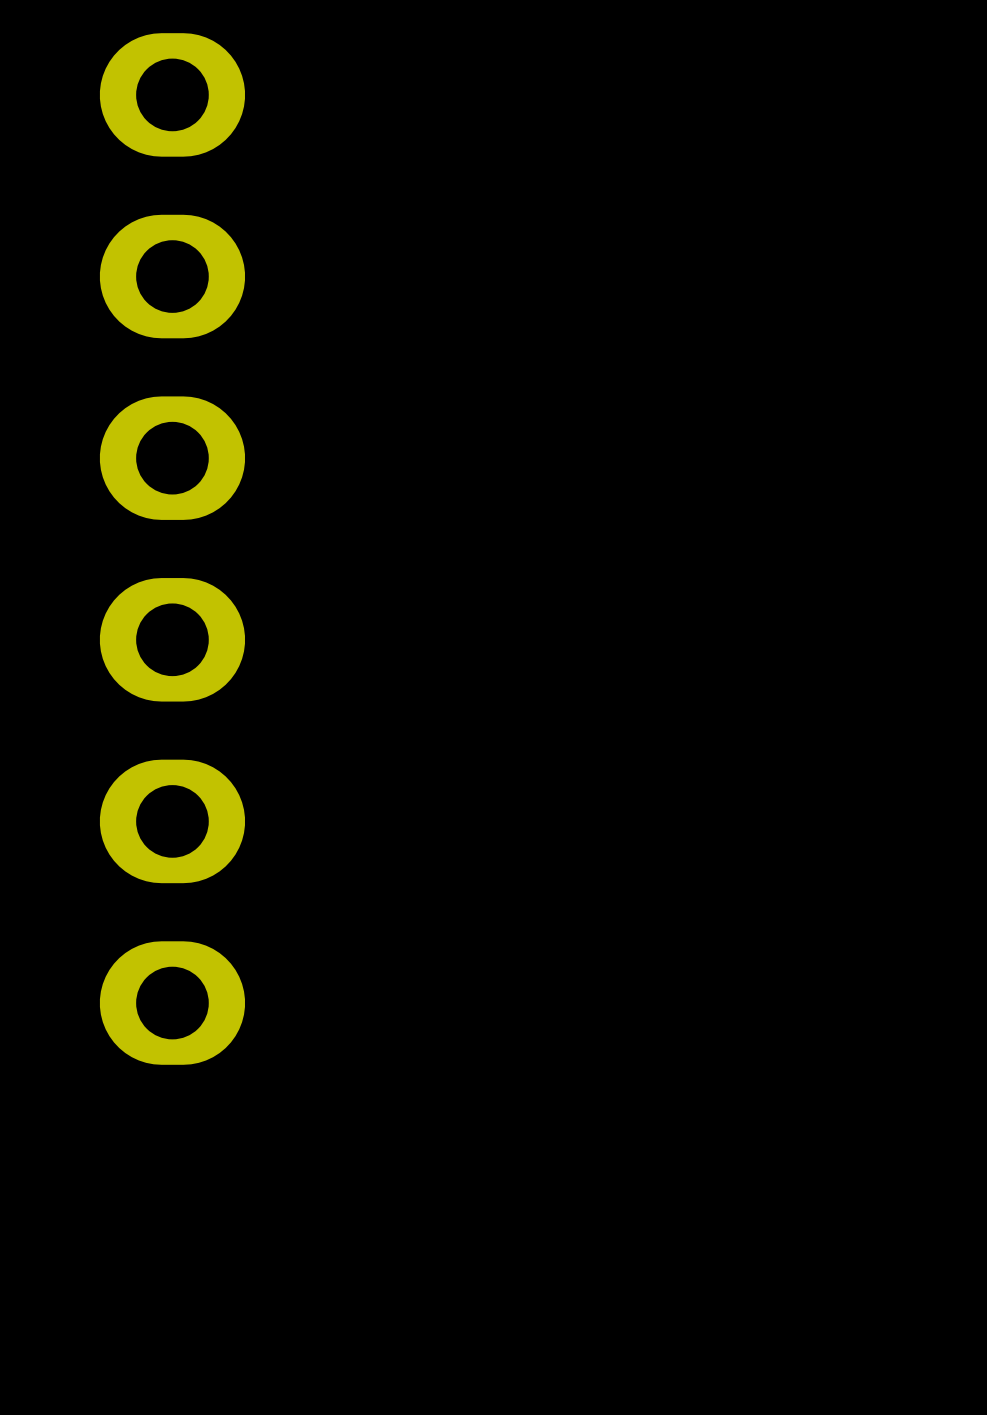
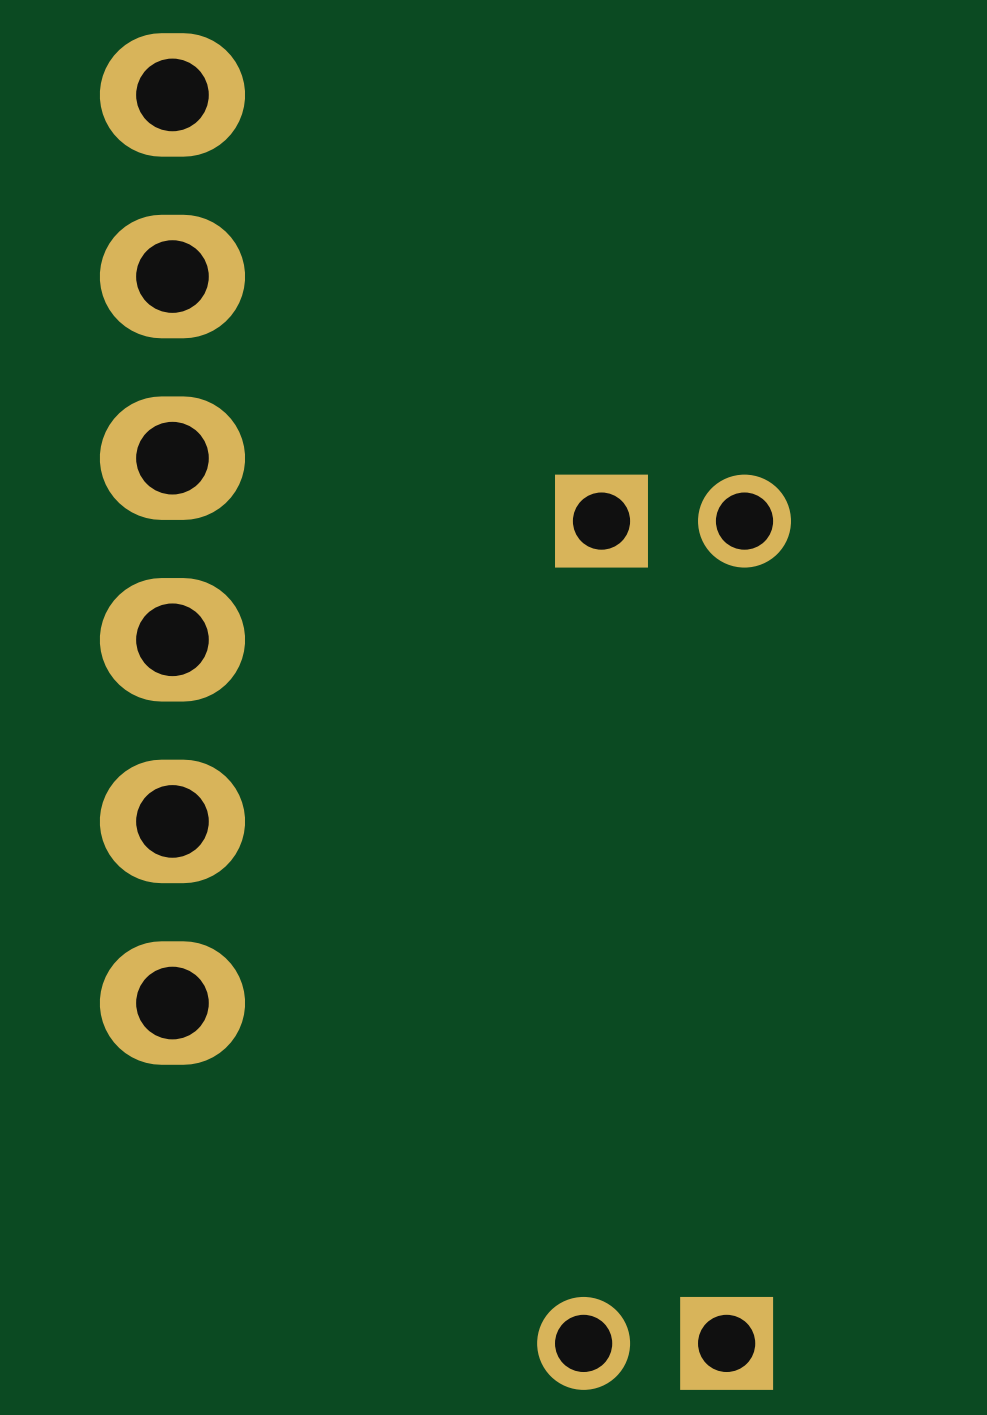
part: none -> (673, 521)
part: none -> (655, 1343)

